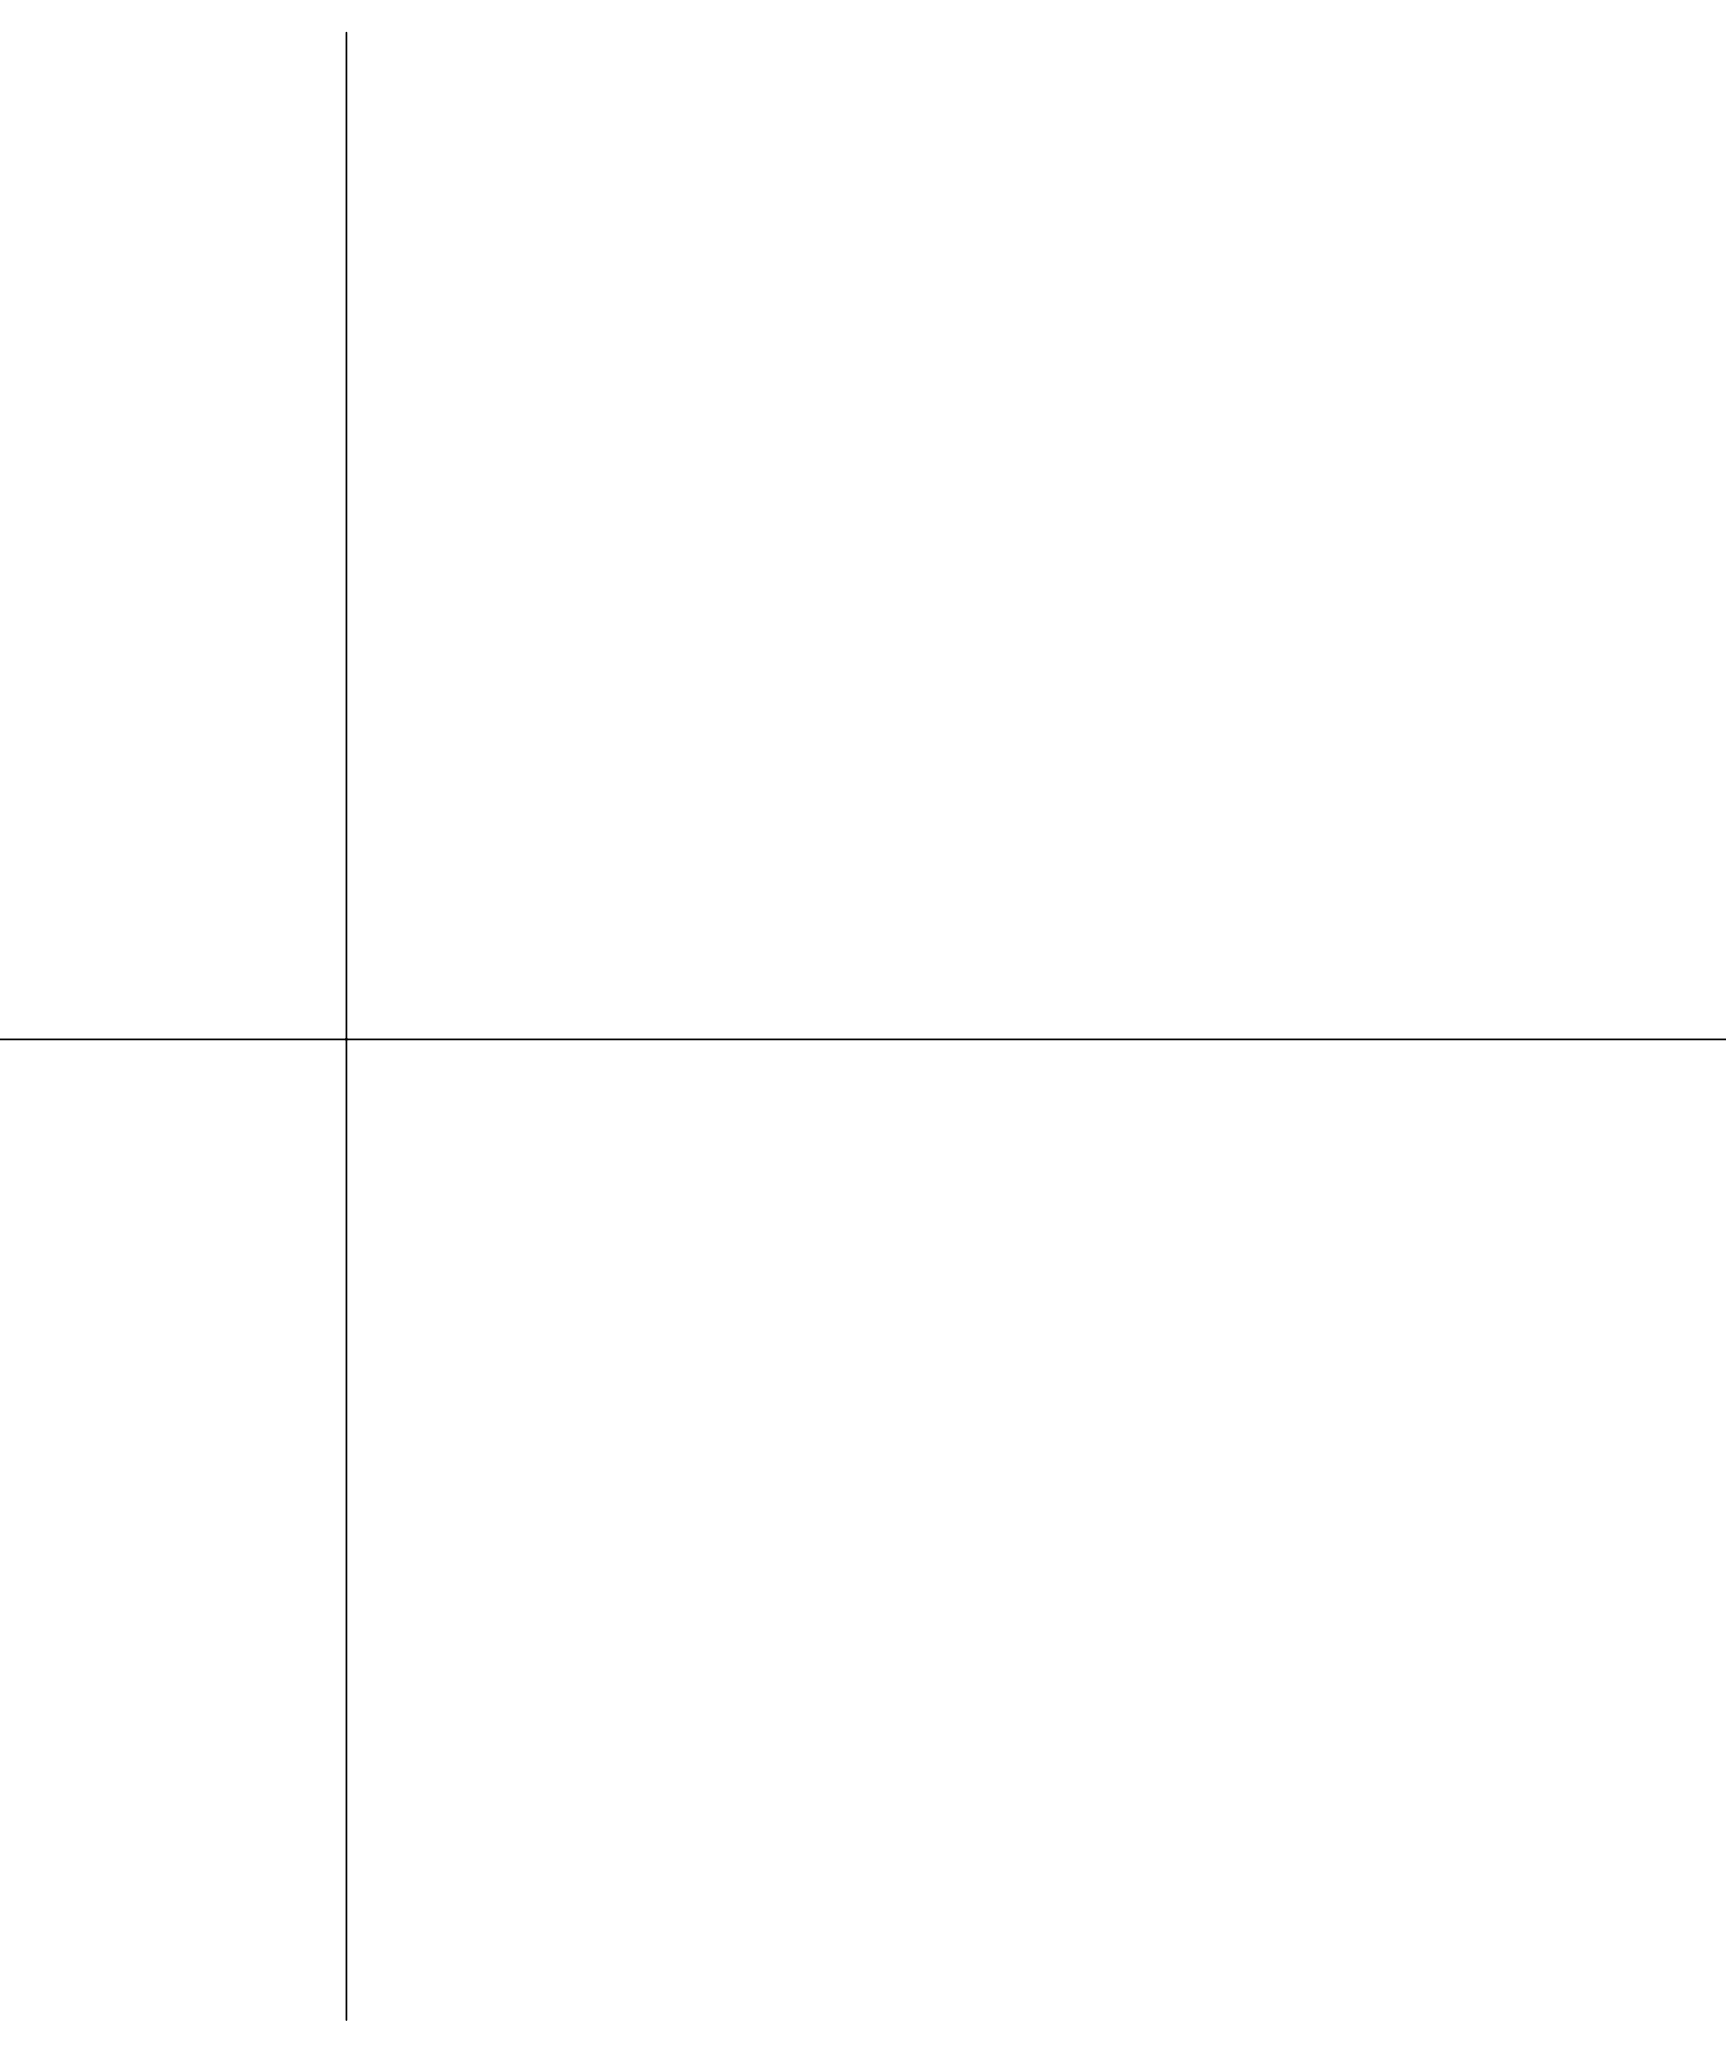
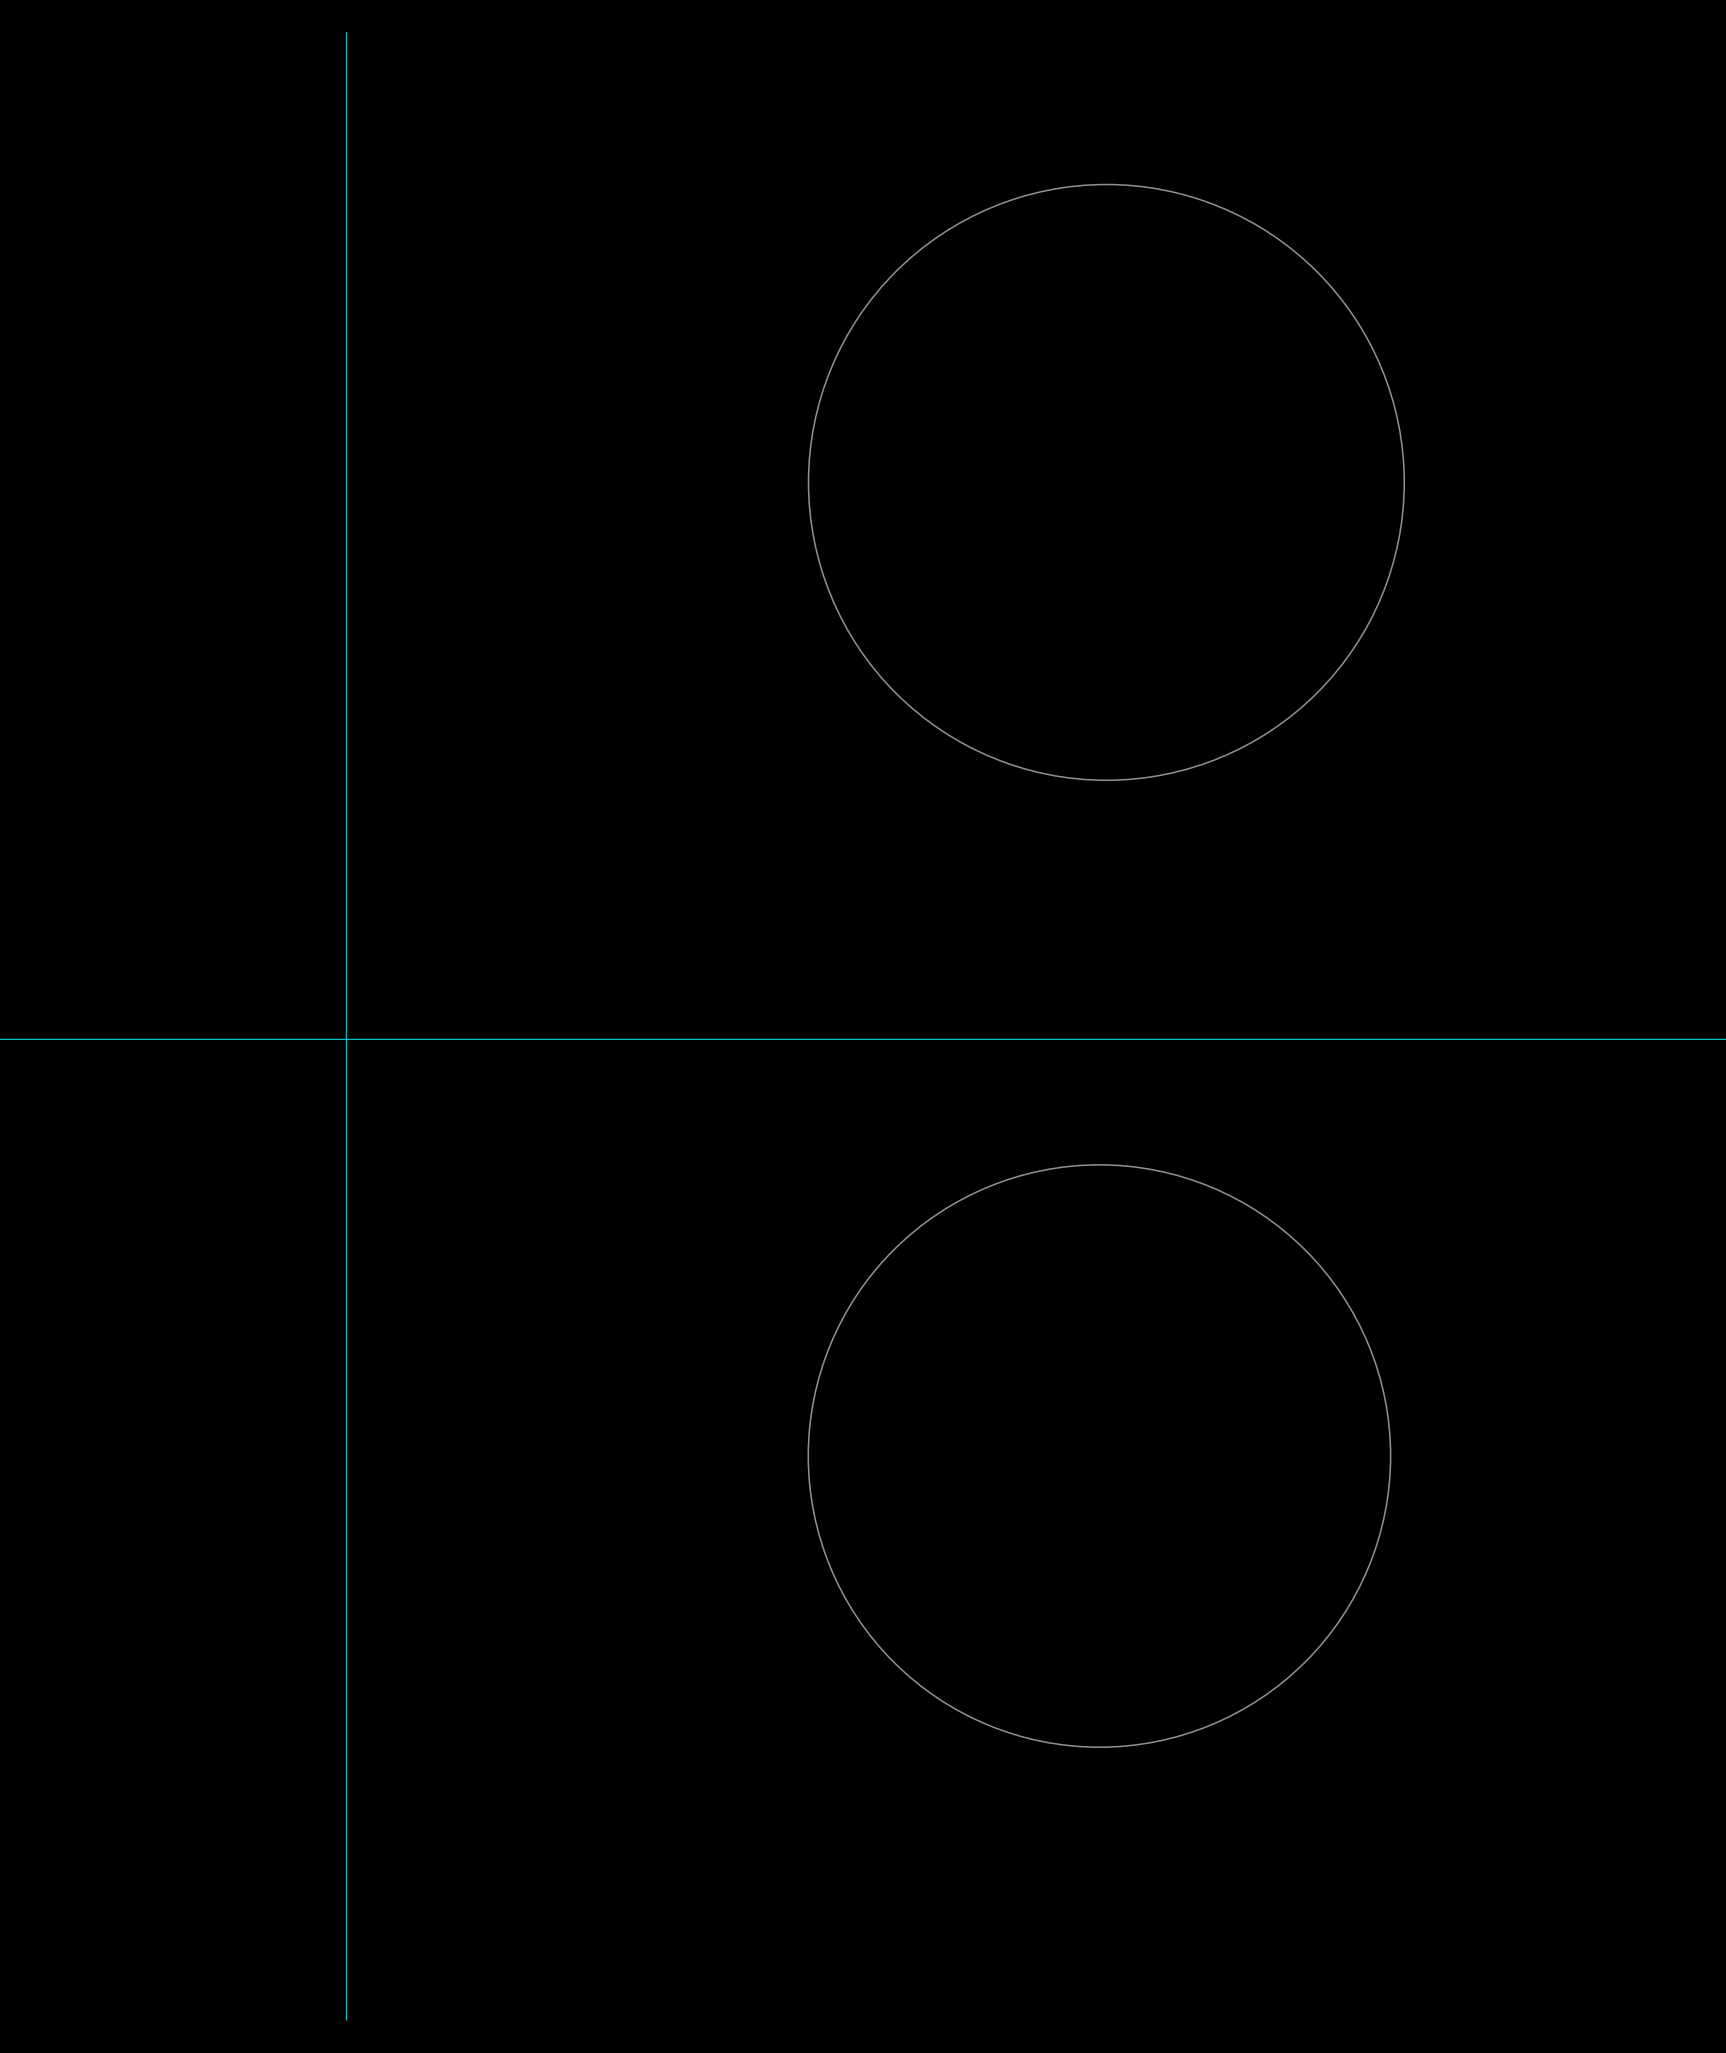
drawing: none -> [807, 183, 1406, 782]
drawing: none -> [807, 1164, 1392, 1748]

